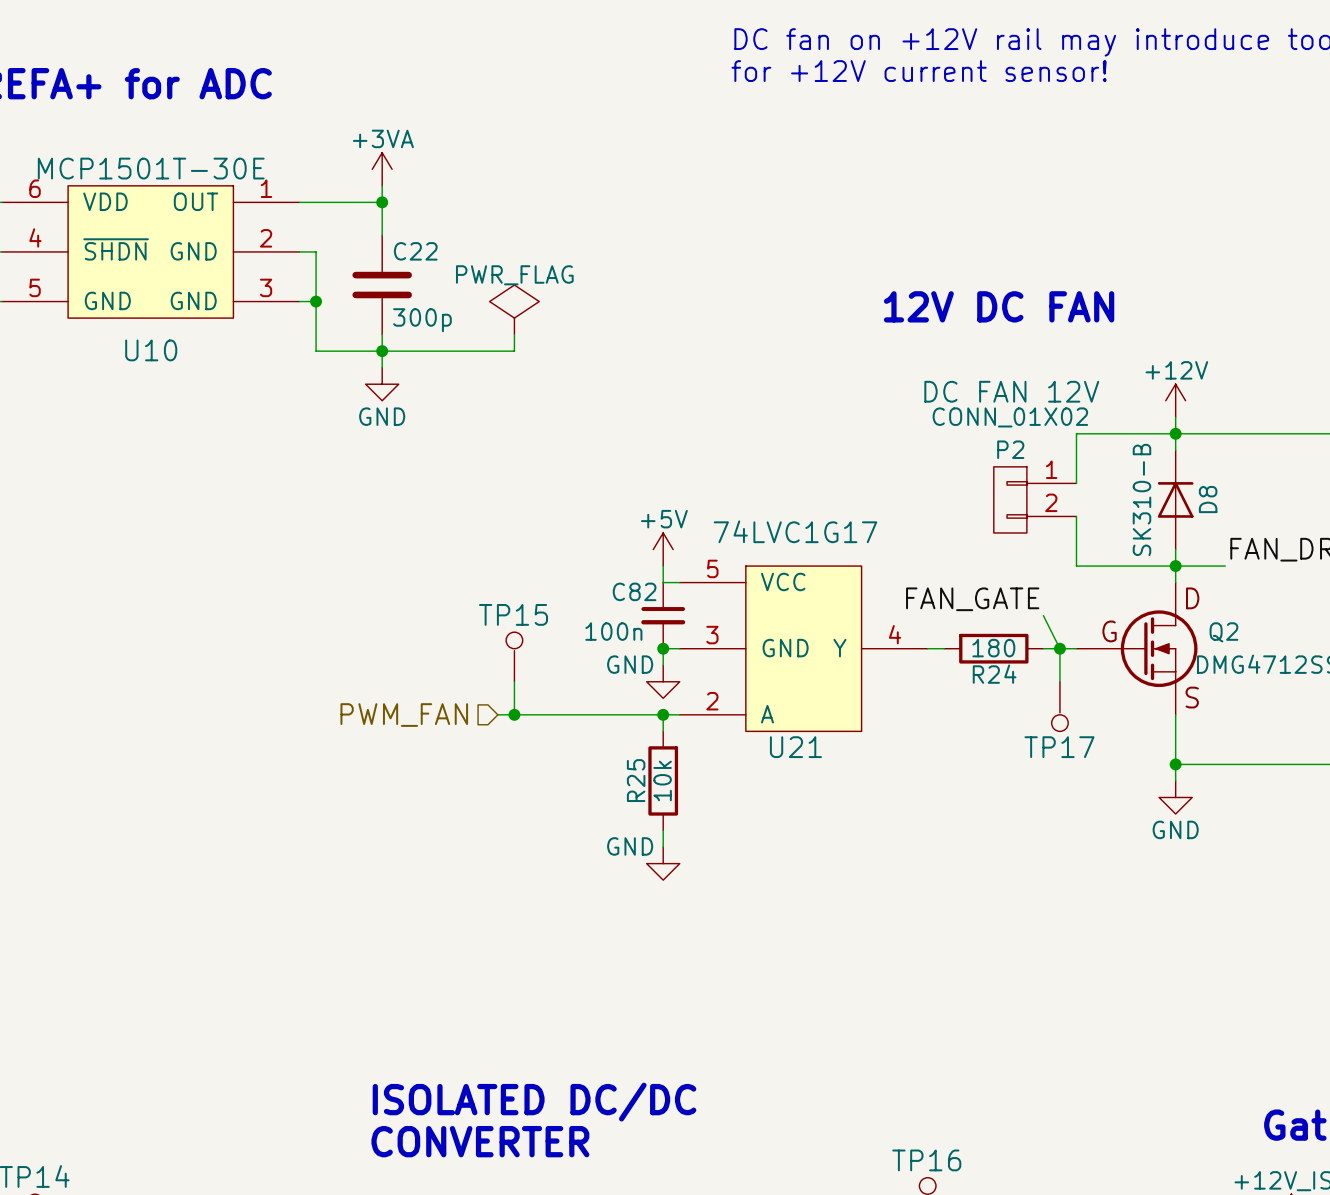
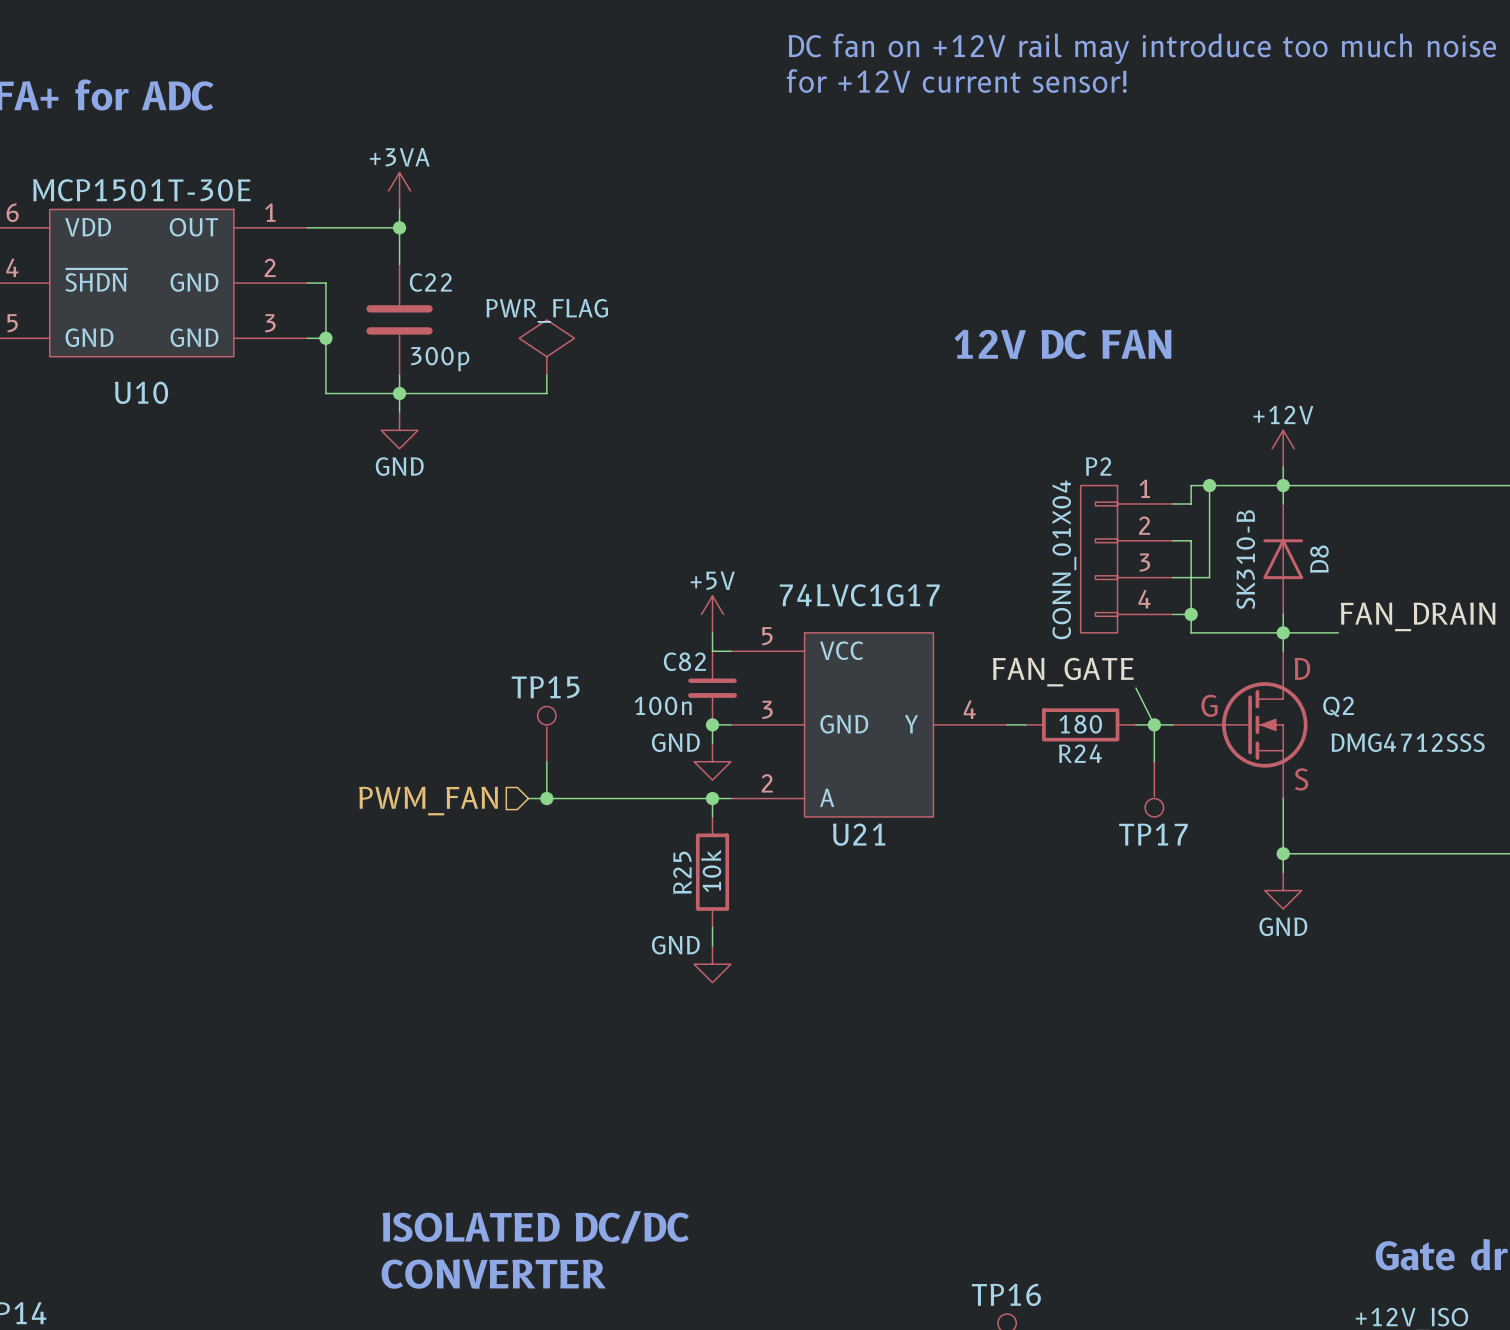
P2 text: DC FAN 12V (1011, 391) -> none
P2 value: CONN_01X02 (1010, 417) -> CONN_01X04 (1064, 559)
wire: (1093, 433) (1076, 433) (1076, 483) -> (1191, 485) (1191, 503) (1172, 503)
wire: none -> (1209, 485) (1209, 577) (1172, 577)
junction: none -> (1209, 485)
P2 name position: P2 (1010, 449) -> P2 (1098, 466)
P2 symbol: [993, 466, 1077, 533] -> [1080, 485, 1173, 633]
wire: (1076, 516) (1076, 566) (1093, 566) -> (1172, 540) (1191, 540) (1191, 632)
wire: none -> (1172, 614) (1191, 614)
junction: none -> (1191, 614)

